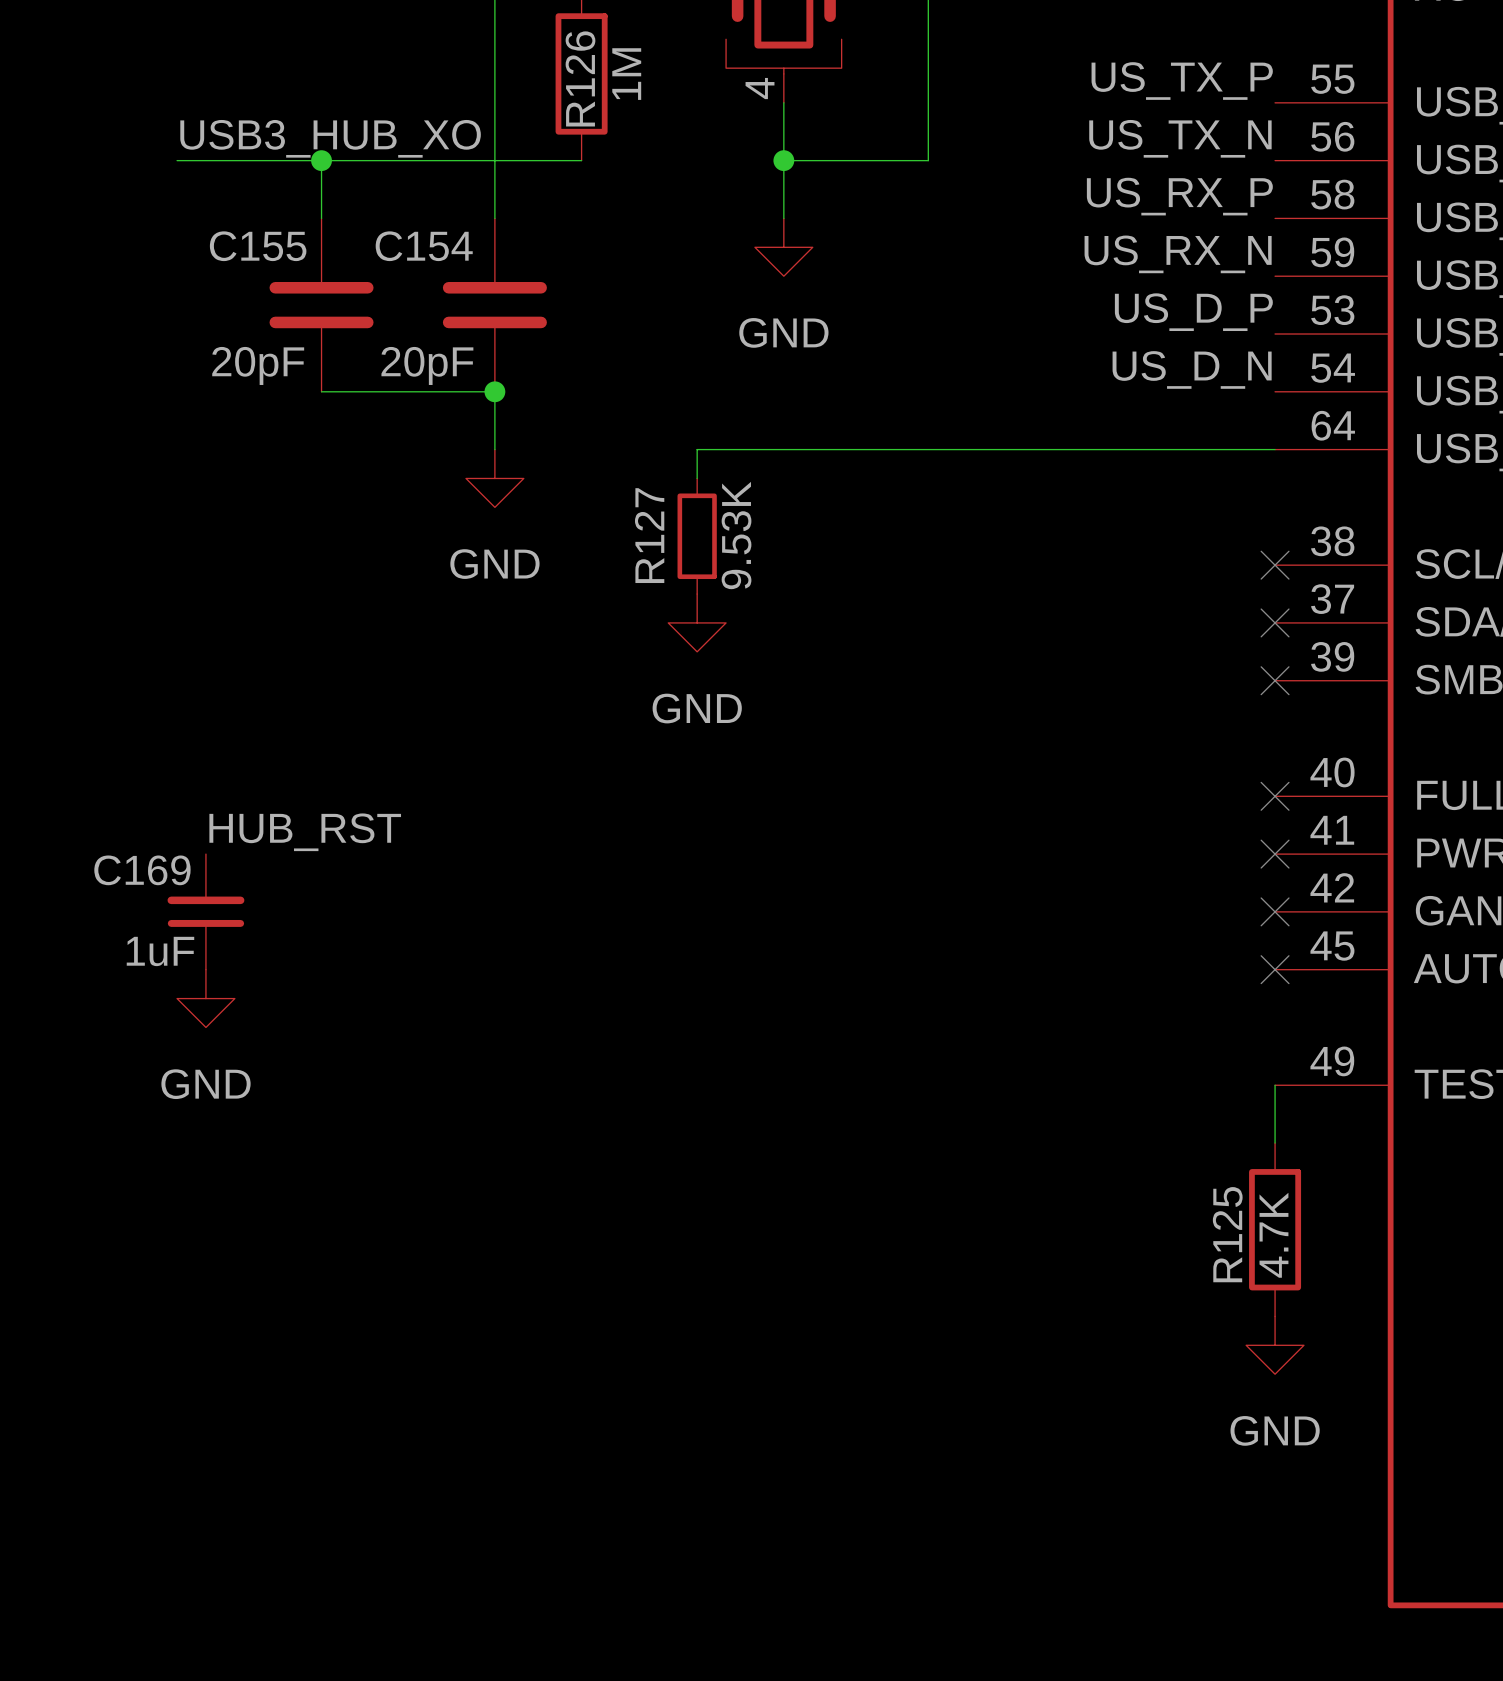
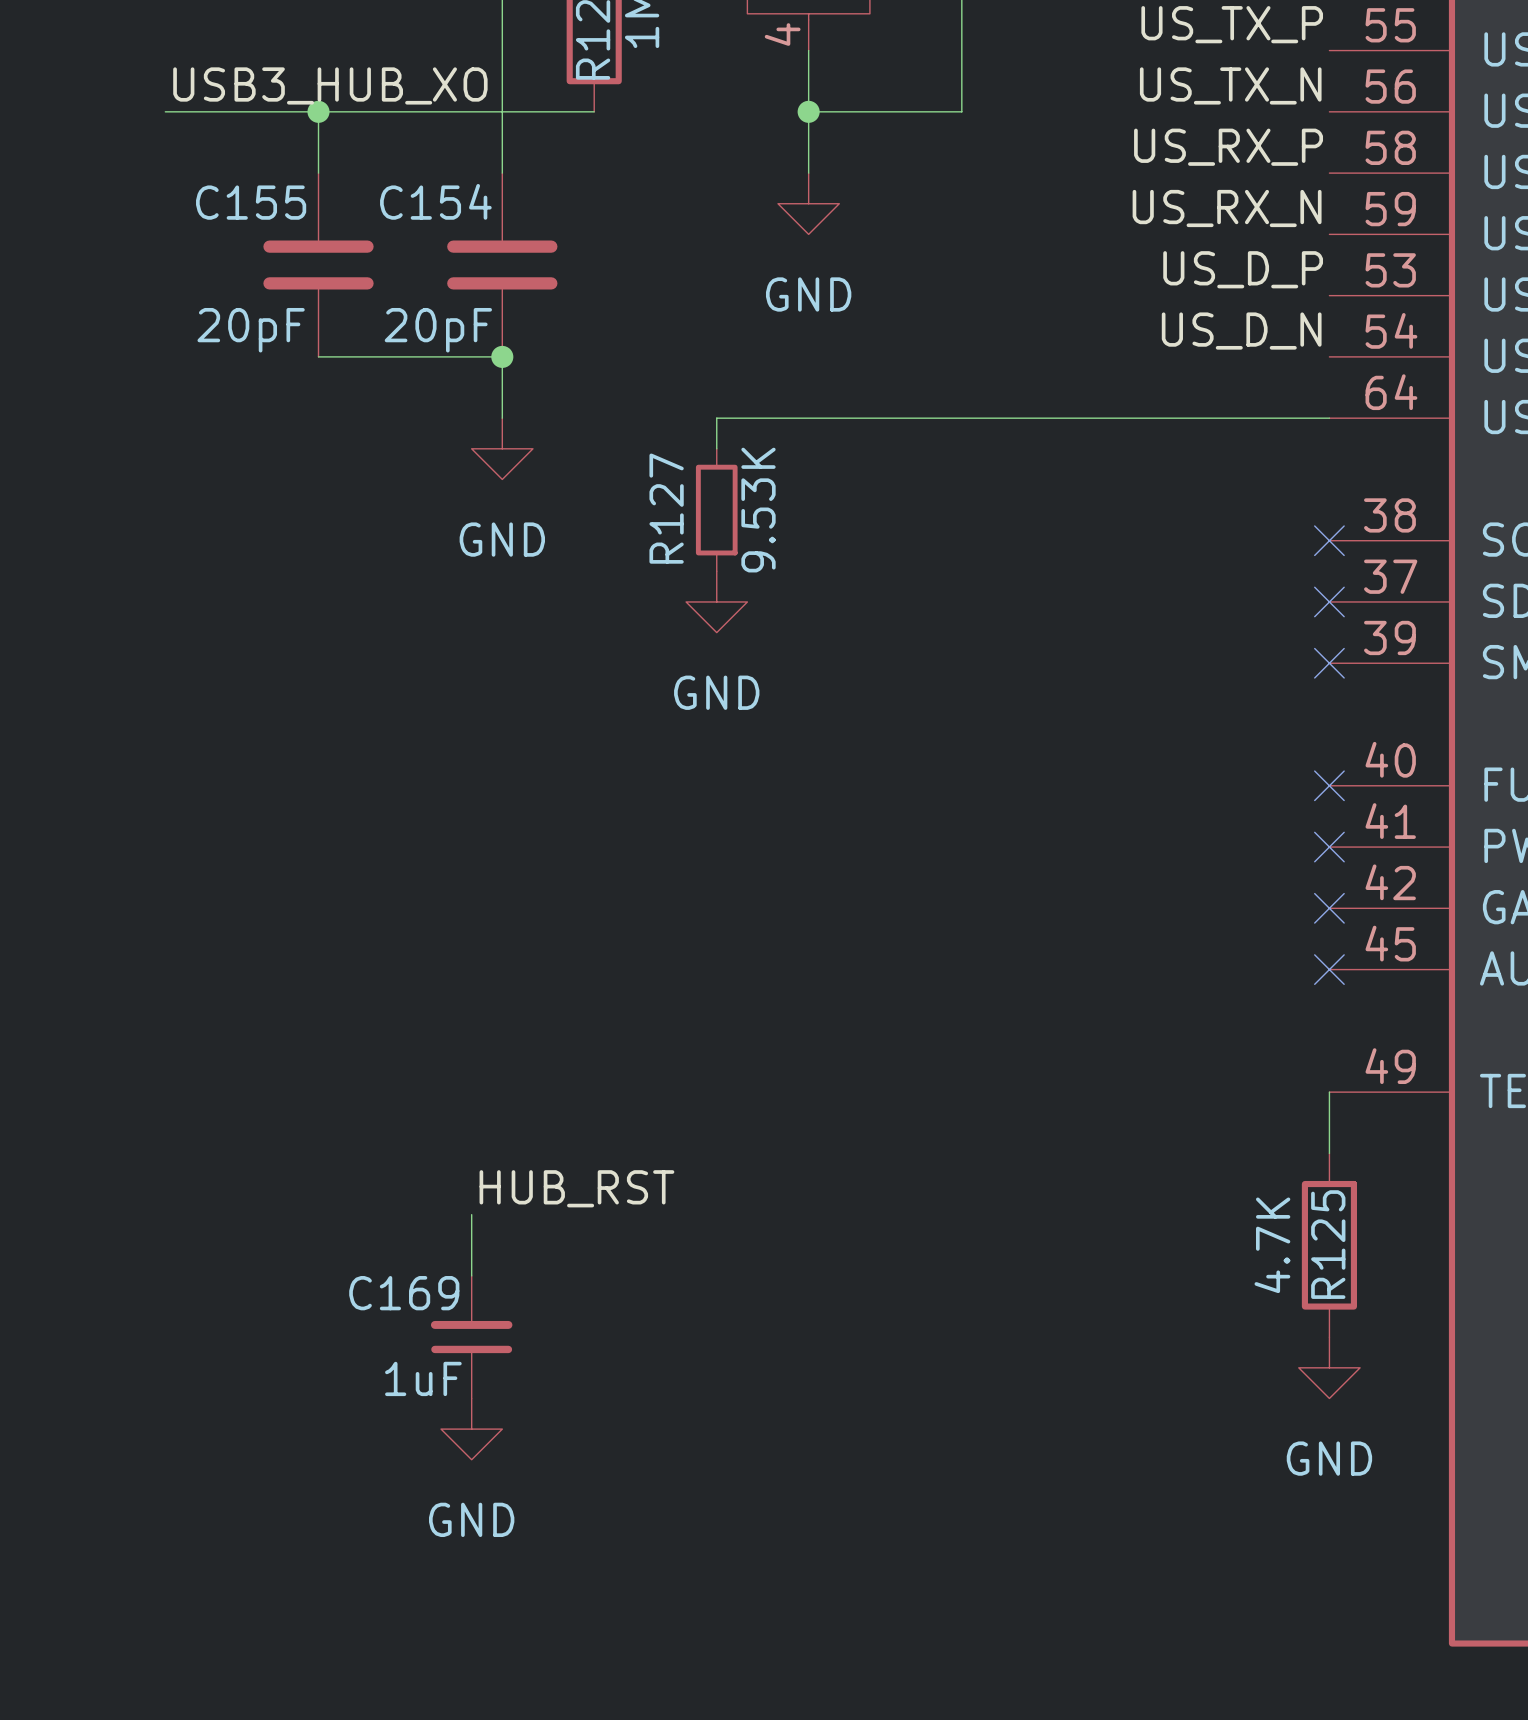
label position: HUB_RST (305, 832) -> HUB_RST (576, 1188)
C169 position: (205, 911) -> (471, 1337)
power symbol position: GND (205, 998) -> GND (471, 1429)
wire: none -> (471, 1214) (471, 1275)
R125 name position: R125 (1227, 1234) -> R125 (1328, 1244)
R125 value position: 4.7K (1273, 1235) -> 4.7K (1272, 1245)

